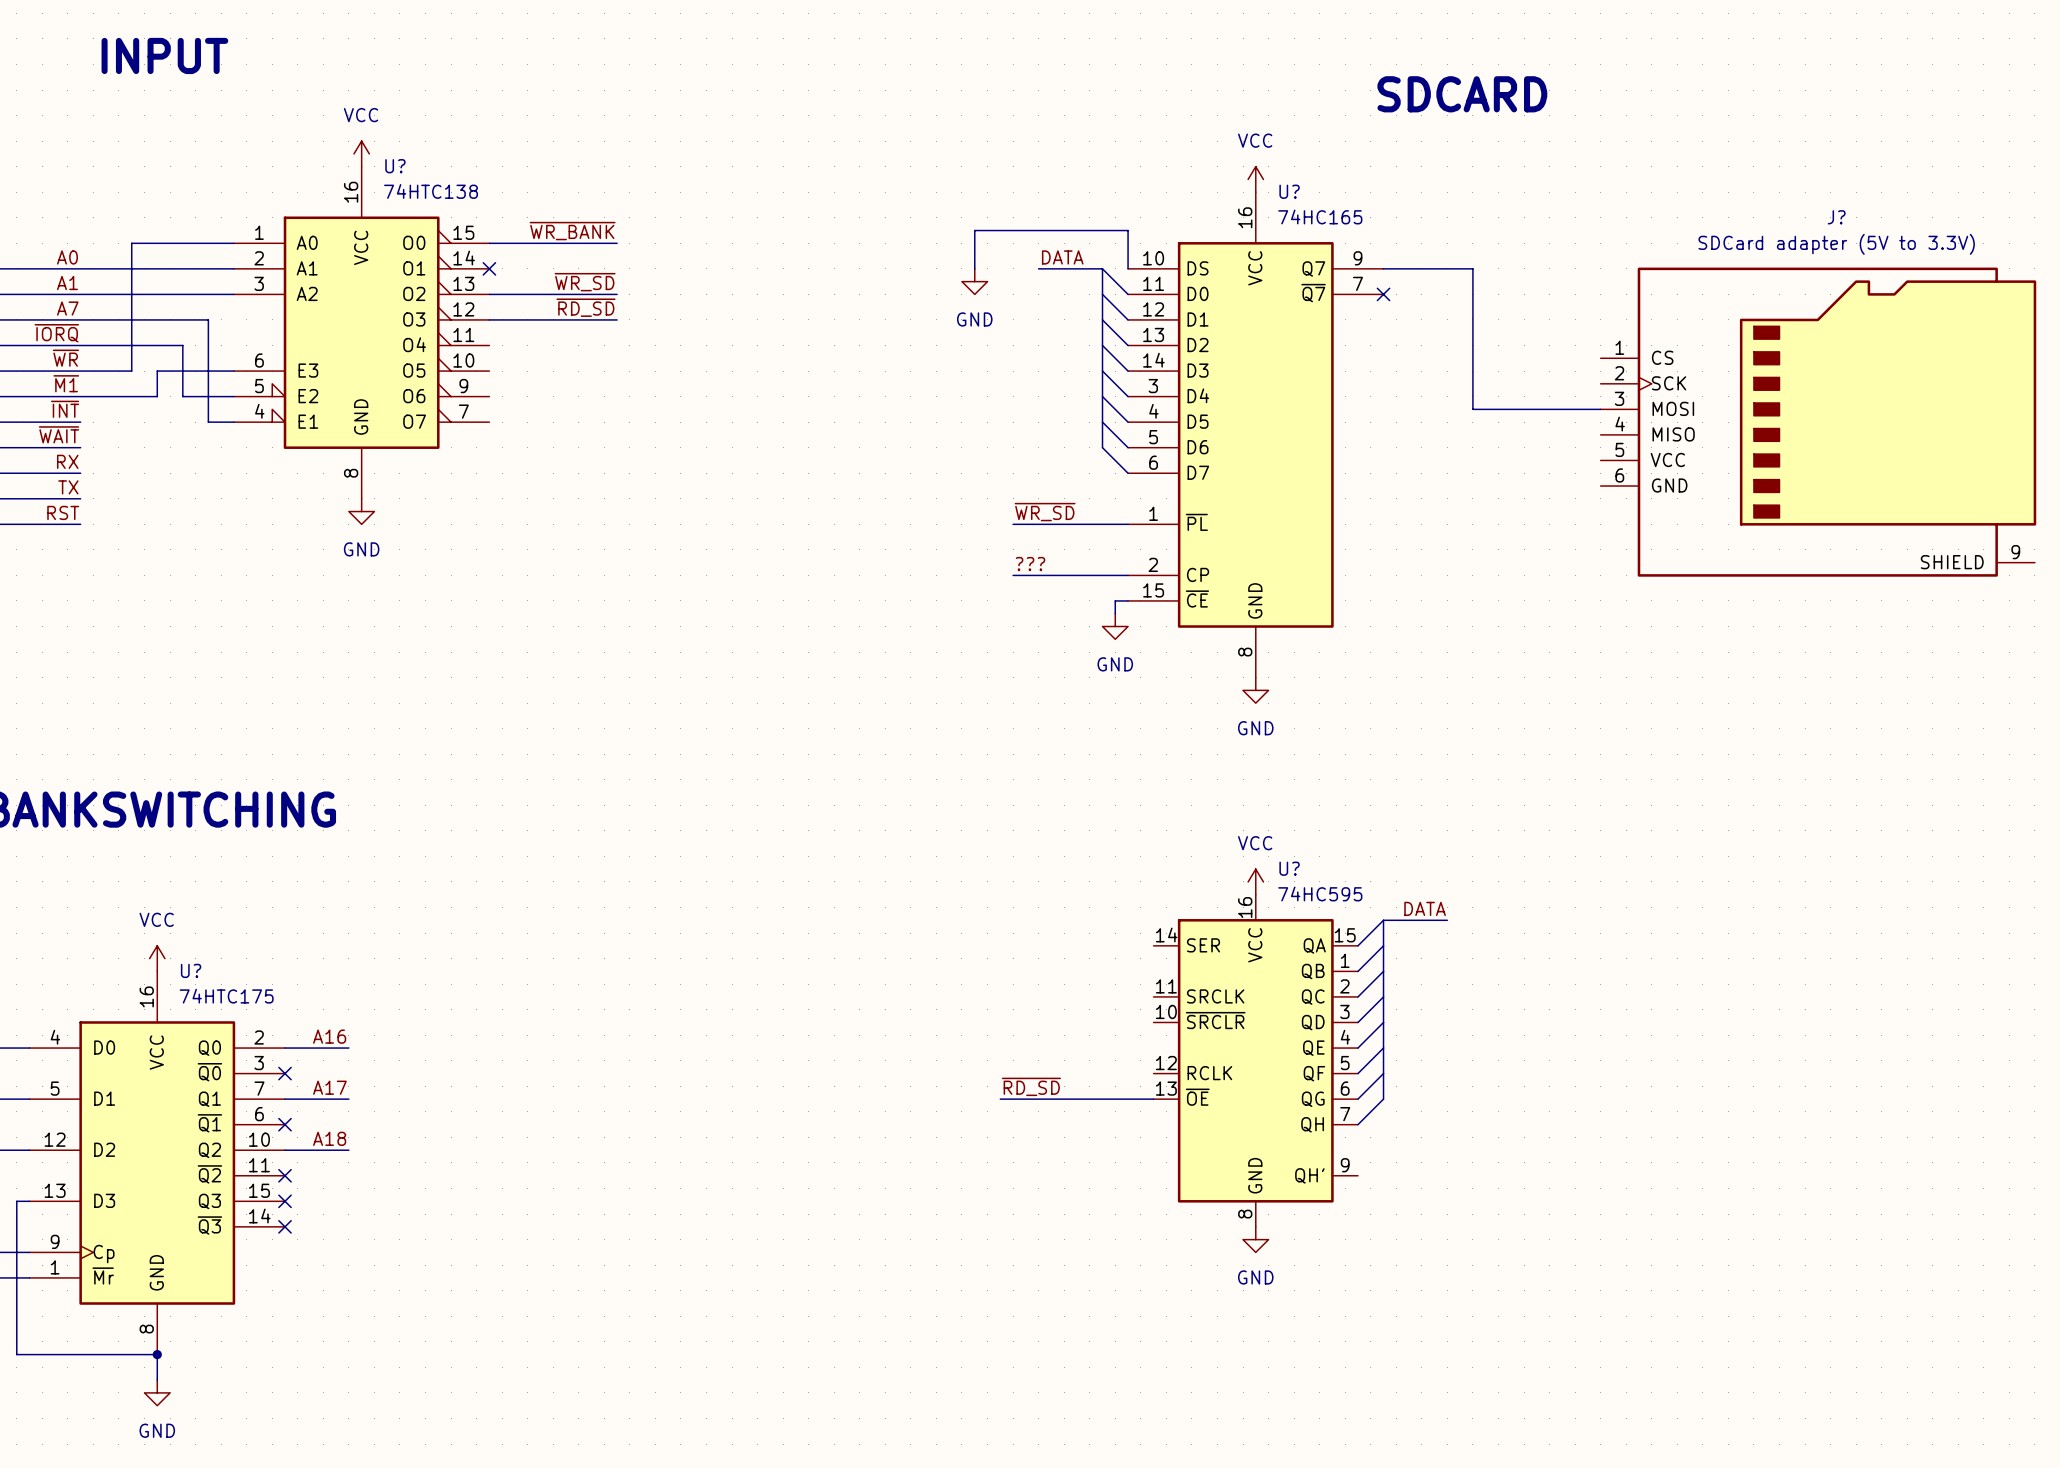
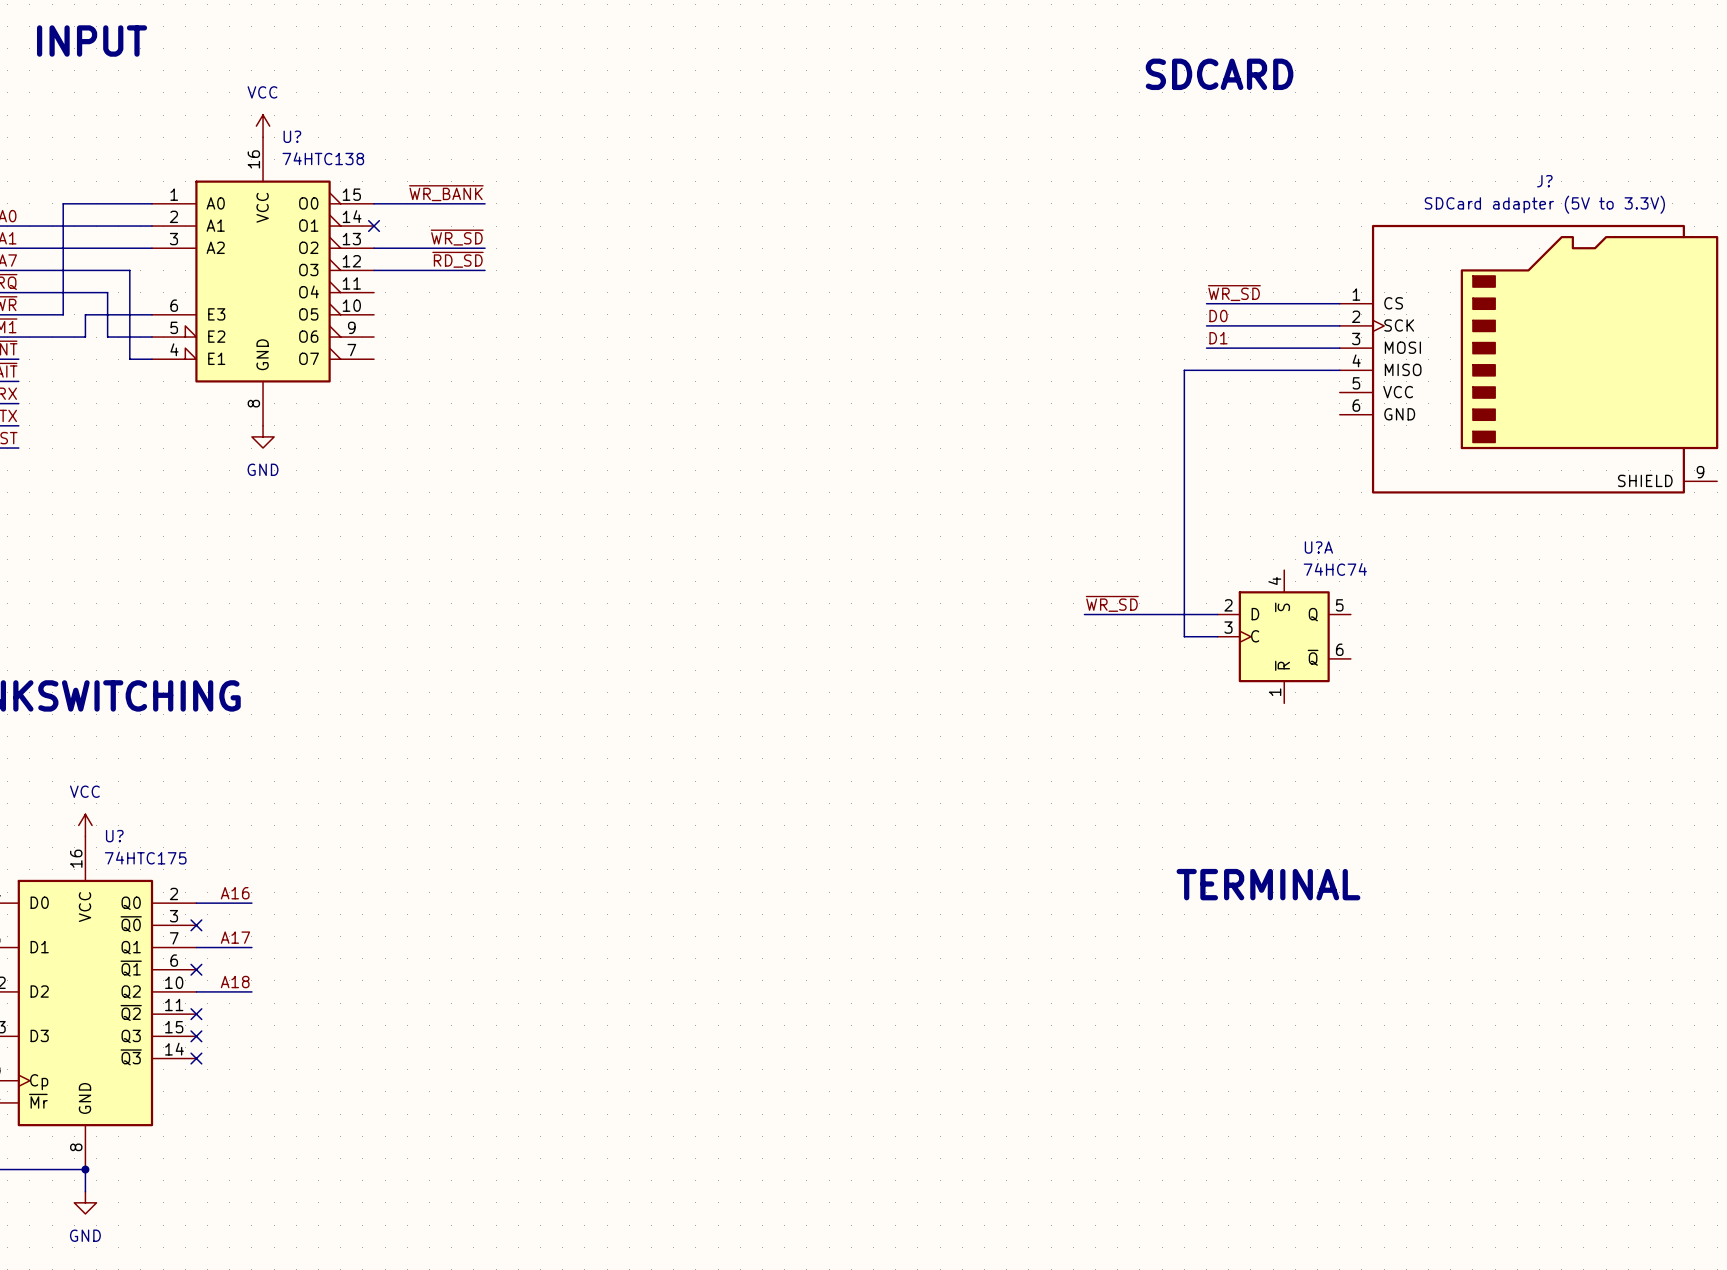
power symbol: VCC (1255, 179) -> none
label: DATA (1062, 257) -> none
wire: (974, 268) (974, 230) (1128, 230) (1128, 268) -> none
bus: (1038, 268) (1102, 268) (1102, 447) -> none
wire: (1102, 268) (1128, 294) -> none
wire: (1383, 268) (1472, 268) (1472, 409) -> (1206, 348) (1228, 348)
power symbol: GND (974, 281) -> none
wire: (1102, 294) (1128, 319) -> none
no-connect mark: (1383, 294) -> none
wire: (1102, 319) (1128, 345) -> none
wire: (1102, 345) (1128, 371) -> none
label: none -> ~{WR_SD} (1234, 293)
wire: none -> (1206, 303) (1339, 303)
wire: (1102, 371) (1128, 396) -> none
label: none -> D0 (1218, 316)
wire: none -> (1206, 325) (1339, 325)
wire: (1102, 396) (1128, 422) -> none
label: none -> D1 (1218, 338)
wire: (1102, 422) (1128, 447) -> none
U?: 74HC165 (1255, 434) -> none
wire: none -> (1339, 370) (1184, 370) (1184, 636) (1217, 636)
wire: (1102, 447) (1128, 473) -> none
label: ~{WR_SD} (1045, 512) -> none
wire: (1013, 524) (1128, 524) -> none
label: ??? (1030, 564) -> none
wire: (1013, 575) (1128, 575) -> none
wire: (1128, 600) (1115, 600) (1115, 613) -> none
power symbol: GND (1115, 626) -> none
power symbol: GND (1255, 690) -> none
label: none -> ~{WR_SD} (1112, 603)
wire: none -> (1084, 614) (1217, 614)
U?A: none -> 74HC74 (1284, 636)
power symbol: VCC (1255, 881) -> none
label: DATA (1425, 908) -> none
wire: (1383, 920) (1357, 945) -> none
bus: (1447, 920) (1383, 920) (1383, 1099) -> none
wire: (1383, 945) (1357, 971) -> none
wire: (1383, 971) (1357, 996) -> none
wire: (1383, 996) (1357, 1022) -> none
wire: (1383, 1022) (1357, 1048) -> none
text: none -> TERMINAL (1268, 884)
wire: (1383, 1048) (1357, 1073) -> none
U?: 74HC595 (1255, 1060) -> none
wire: (1383, 1073) (1357, 1099) -> none
label: ~{RD_SD} (1031, 1086) -> none
wire: (1000, 1099) (1153, 1099) -> none
wire: (1383, 1099) (1357, 1124) -> none
power symbol: GND (1255, 1239) -> none

